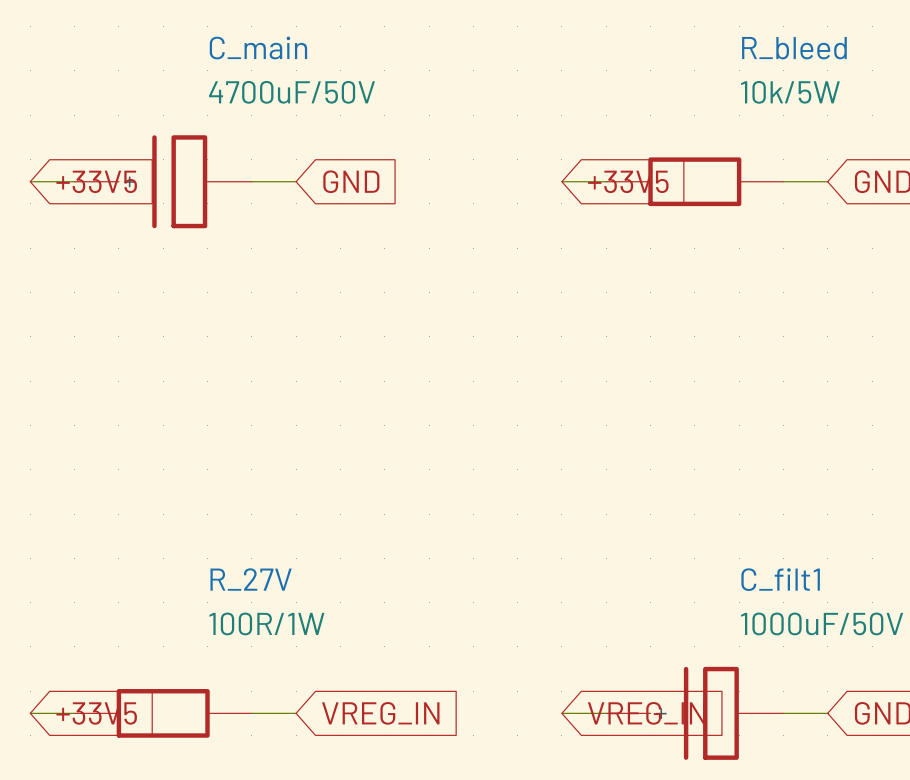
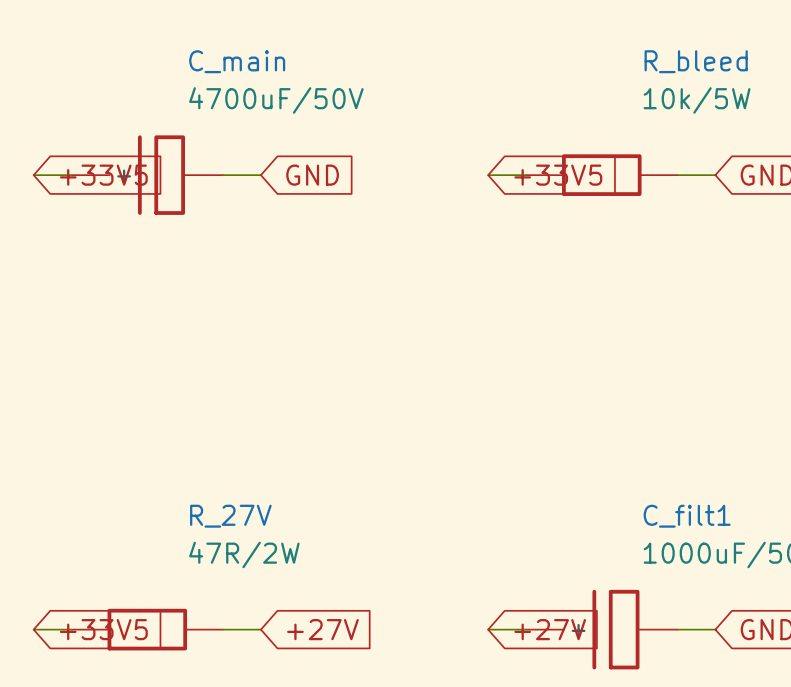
R_27V value: 100R/1W (266, 623) -> 47R/2W (244, 554)
global label: VREG_IN (380, 713) -> +27V (322, 629)
global label: VREG_IN (646, 713) -> +27V (550, 629)

